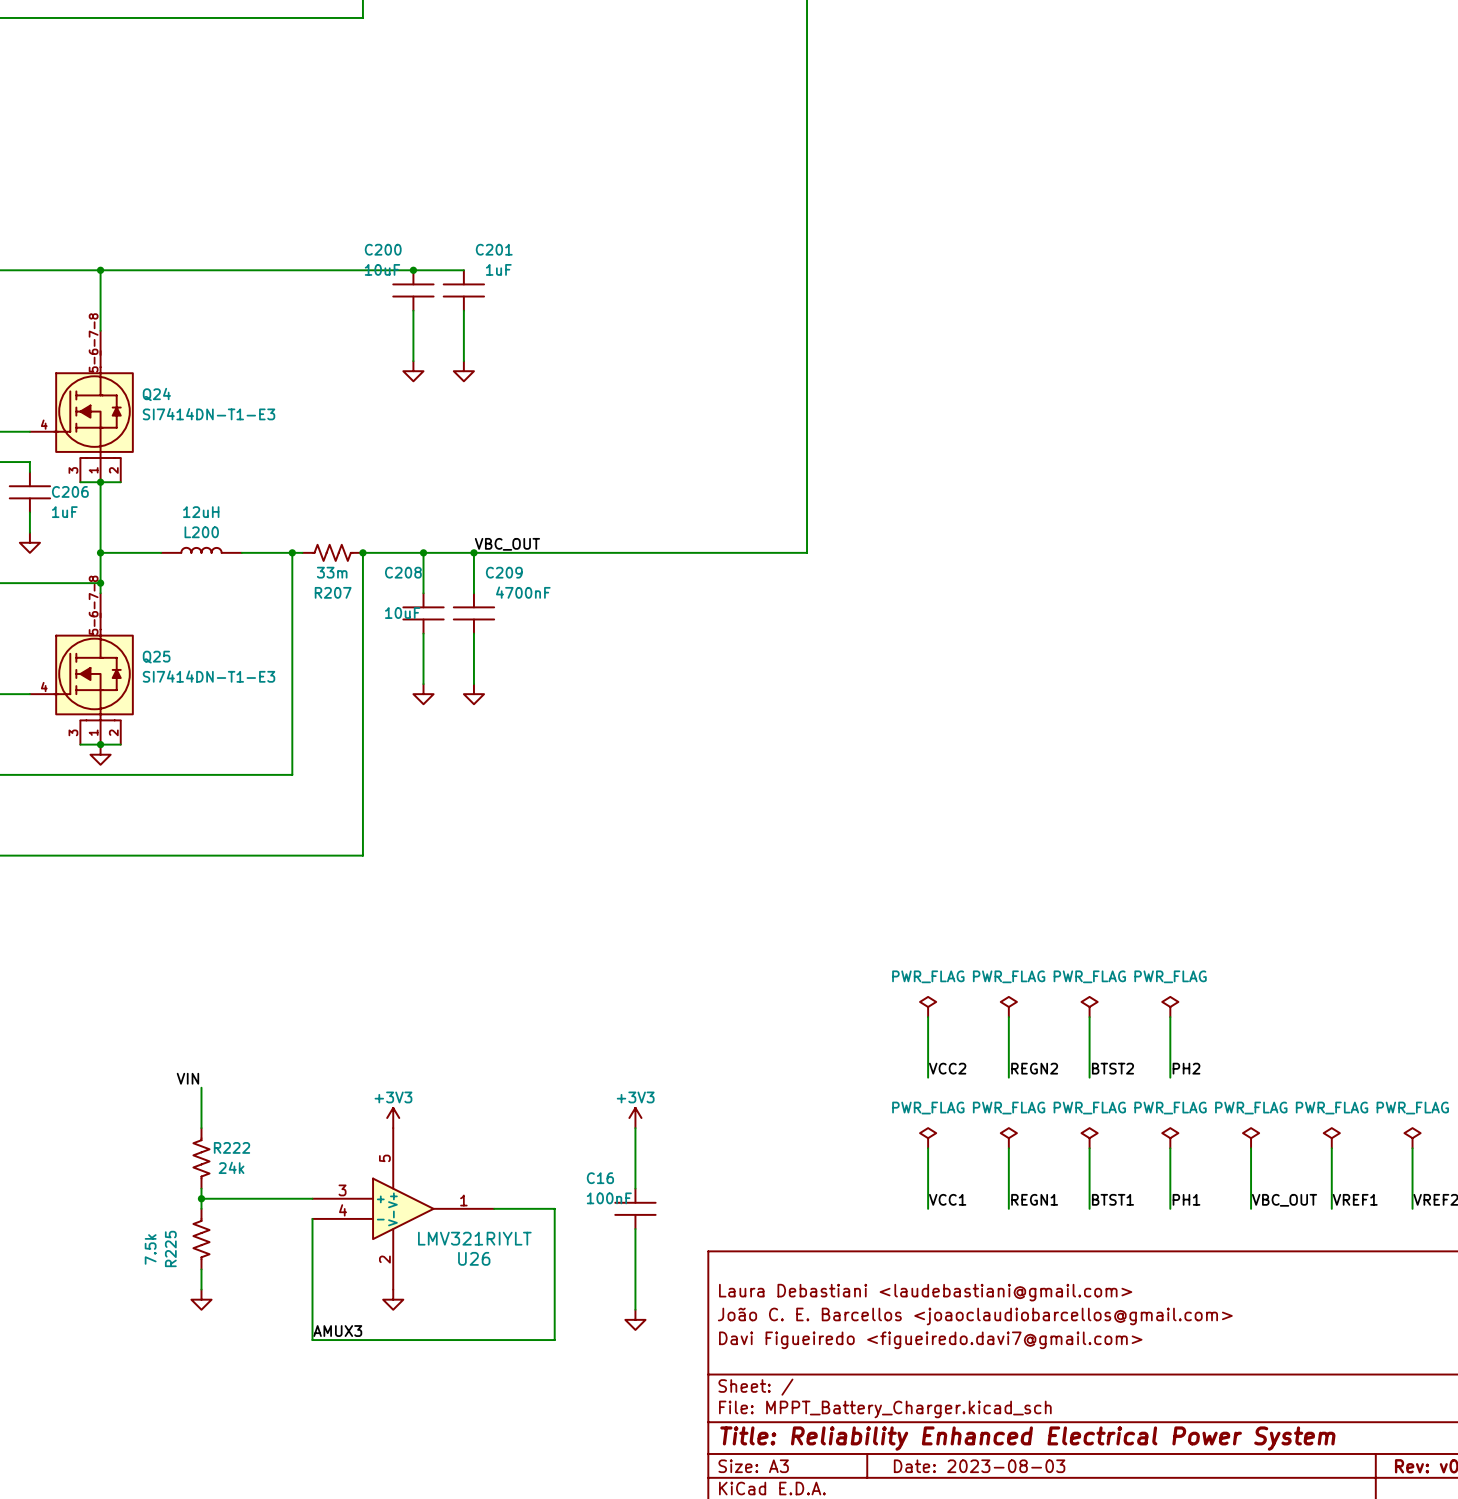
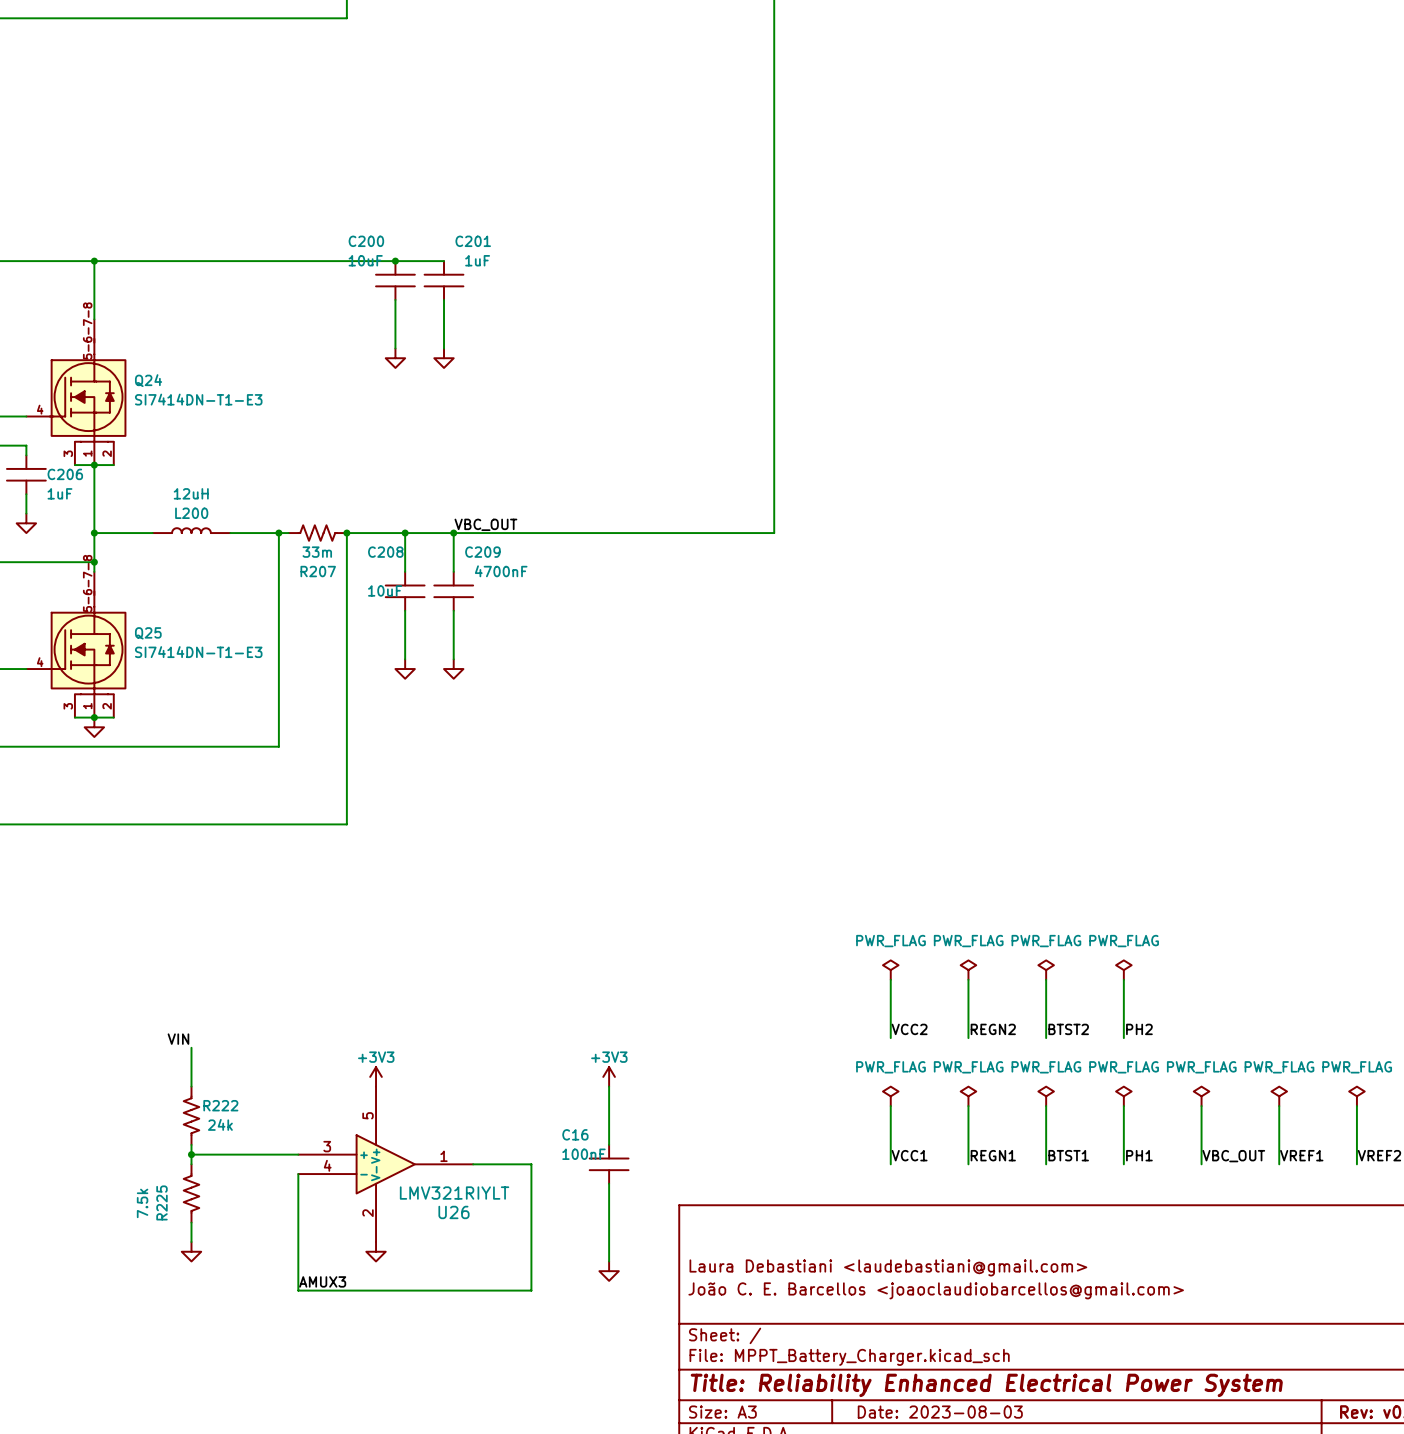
title block: Laura Debastiani <laudebastiani@gmail.com> (925, 1292) -> none
title block: João C. E. Barcellos <joaoclaudiobarcellos@gmail.com> (975, 1316) -> Laura Debastiani <laudebastiani@gmail.com> (888, 1267)
title block: Davi Figueiredo <figueiredo.davi7@gmail.com> (930, 1340) -> João C. E. Barcellos <joaoclaudiobarcellos@gmail.com> (936, 1290)

